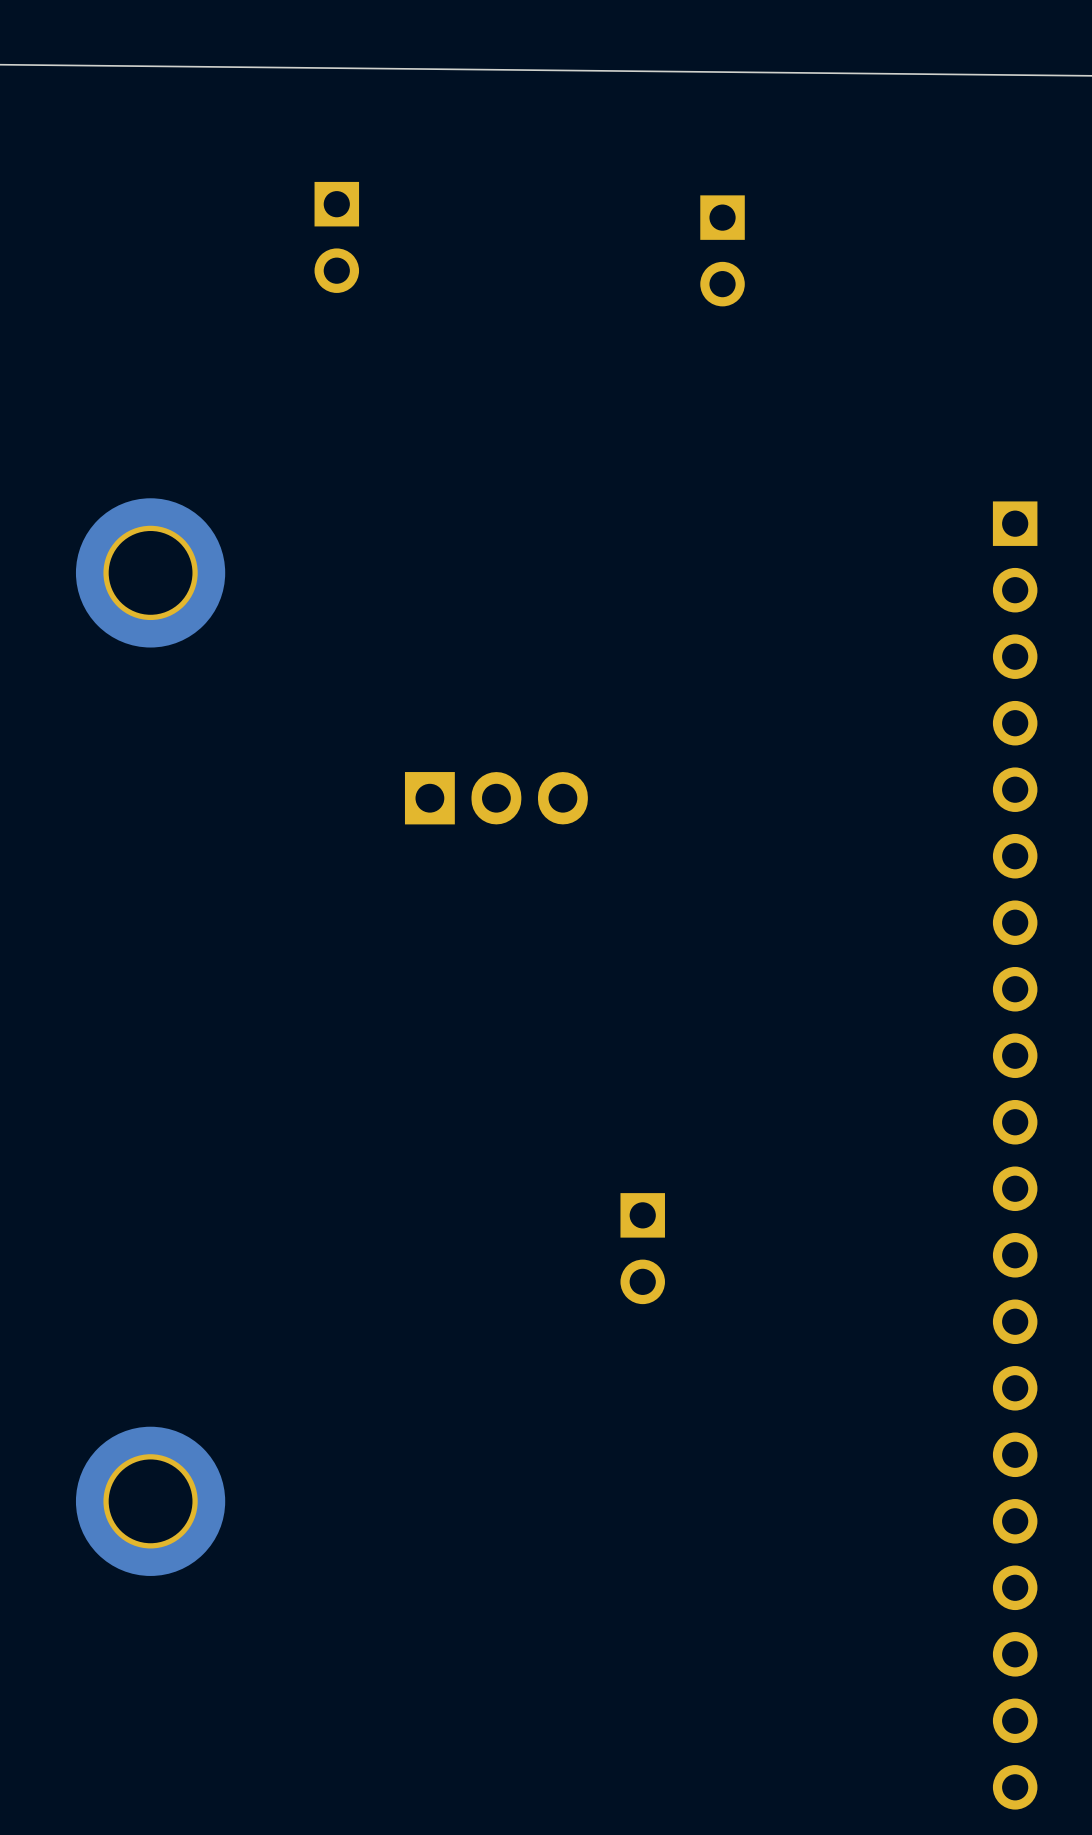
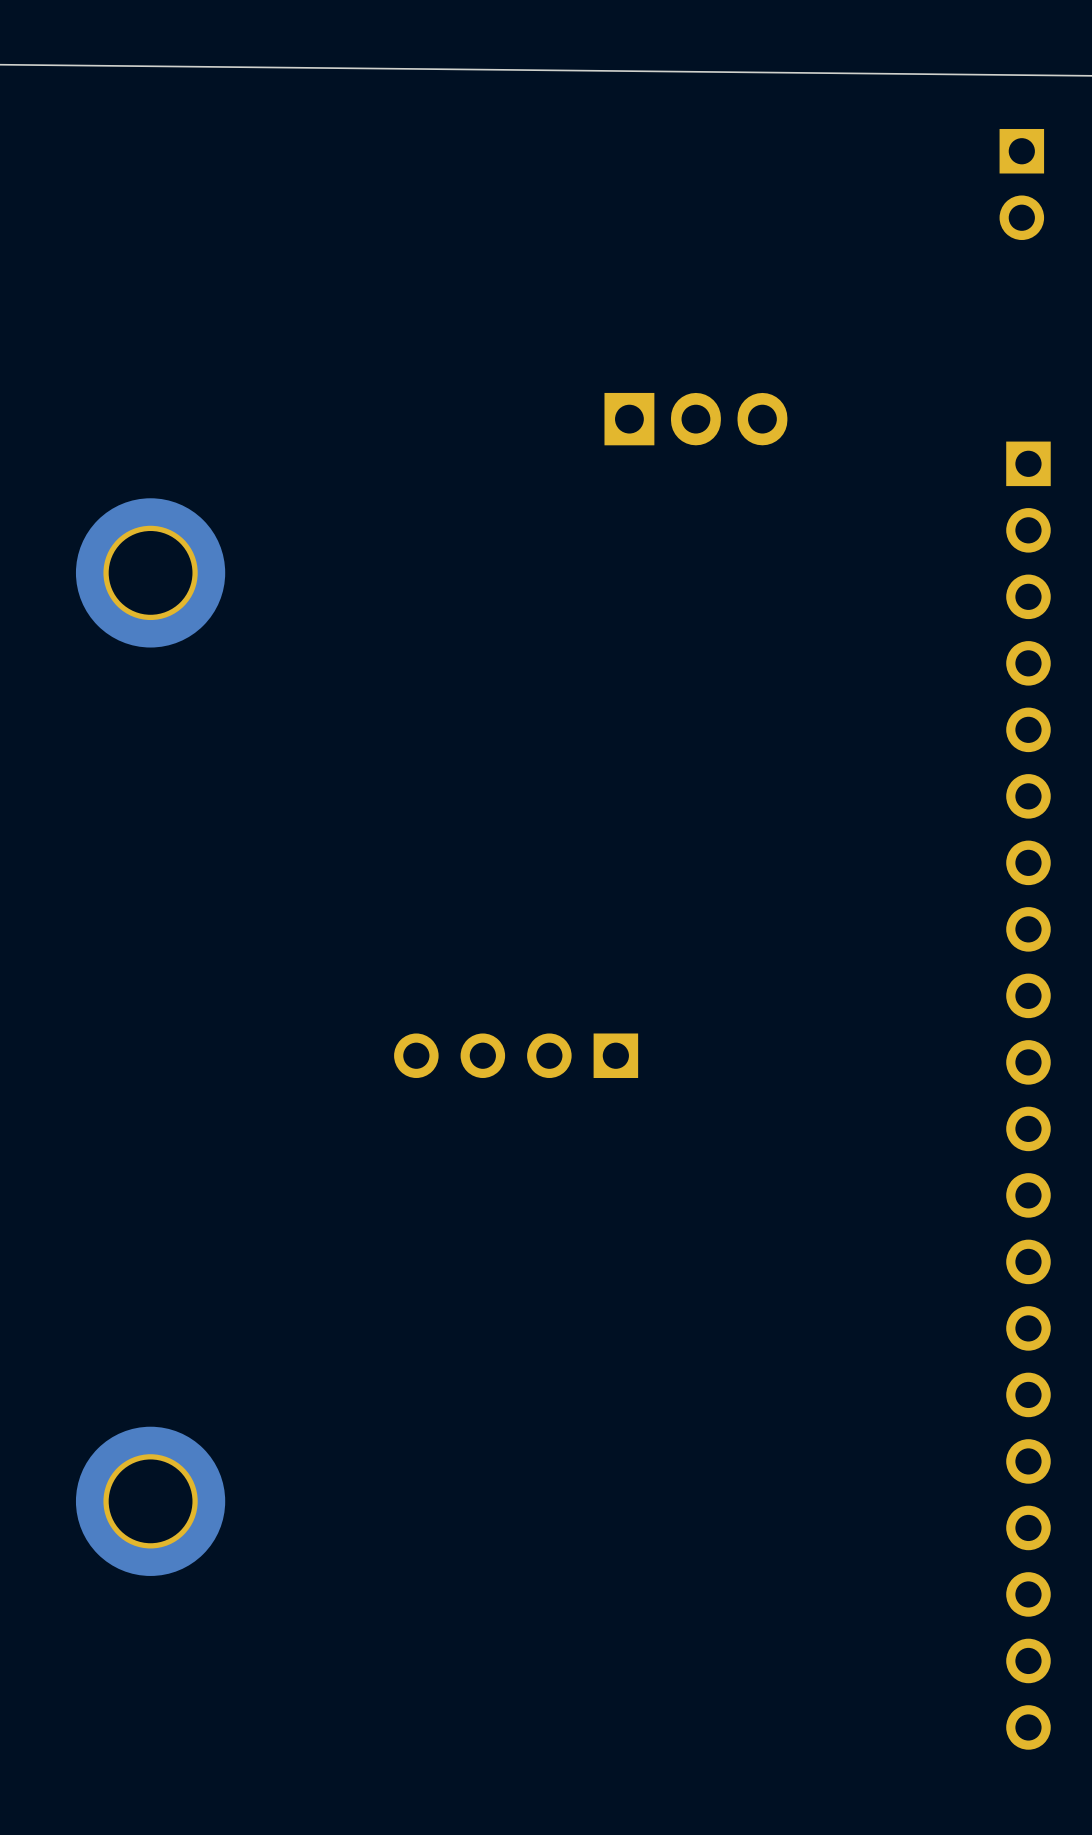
part: (336, 237) -> none
part position: (722, 250) -> (1021, 184)
part position: (496, 798) -> (695, 419)
part: none -> (516, 1055)
part position: (1015, 1155) -> (1028, 1095)
part: (642, 1248) -> none

